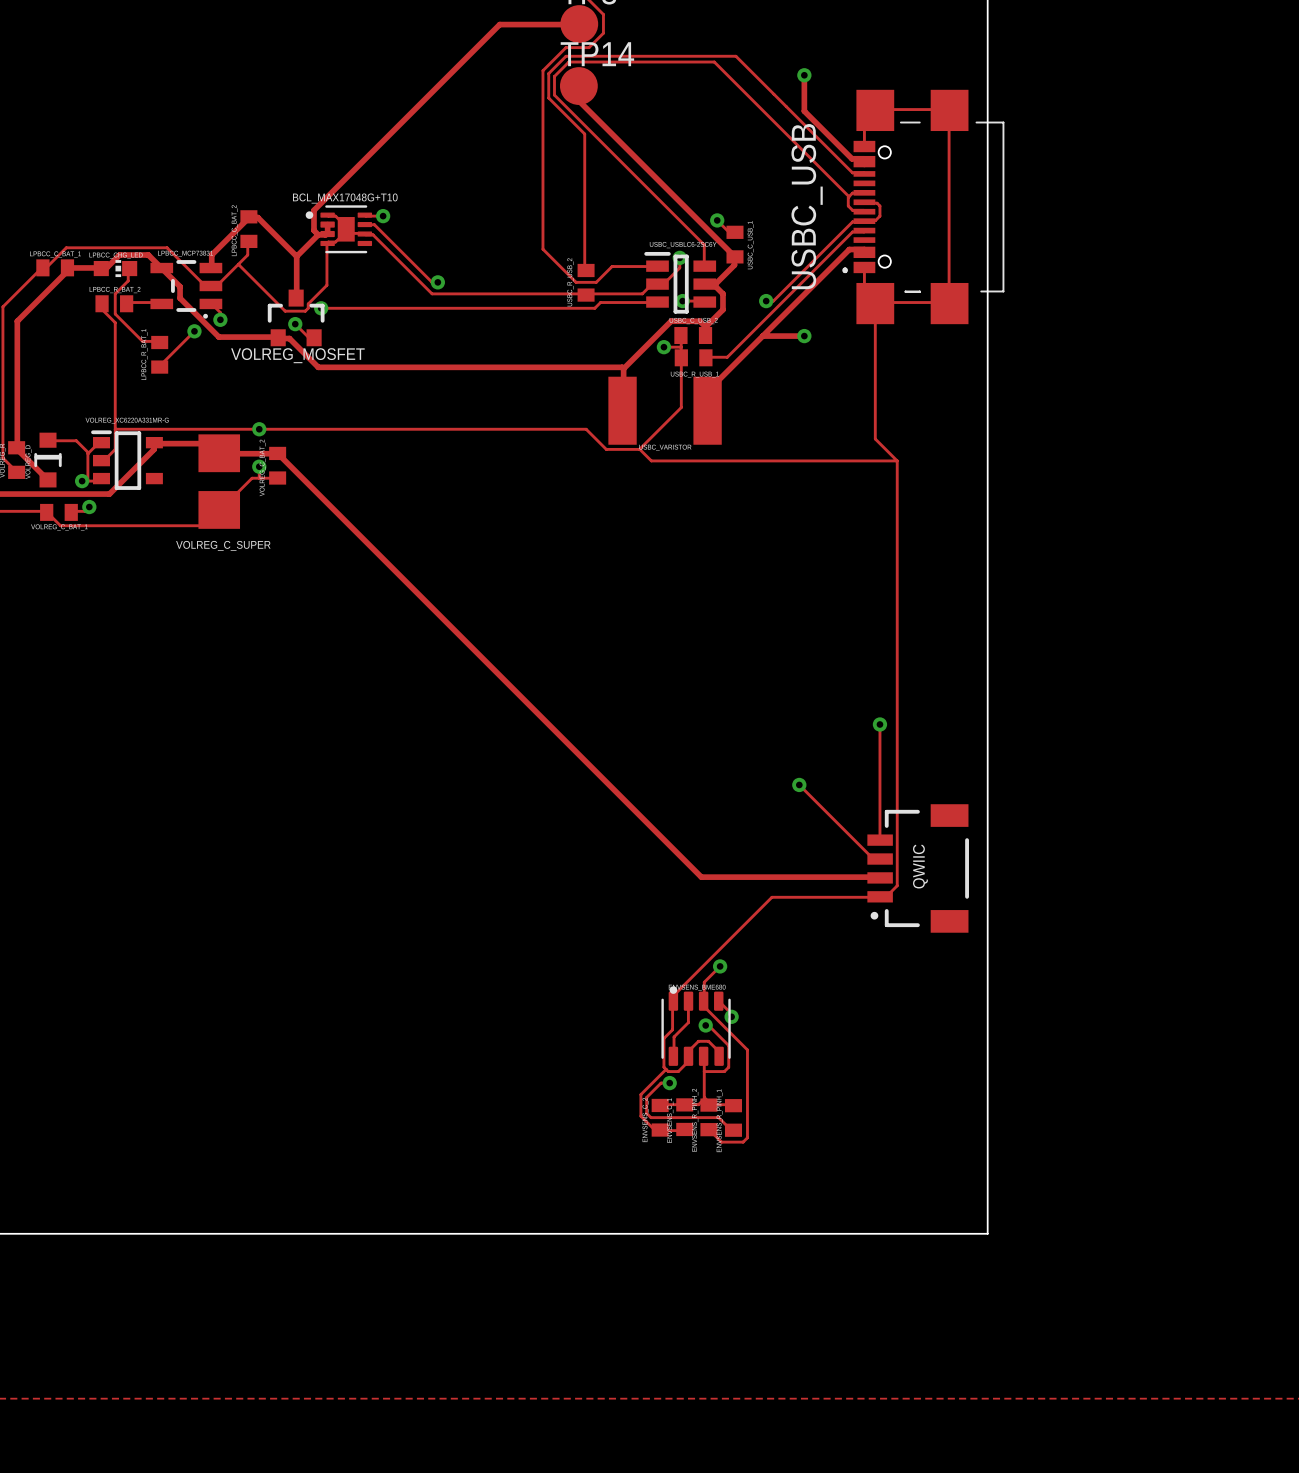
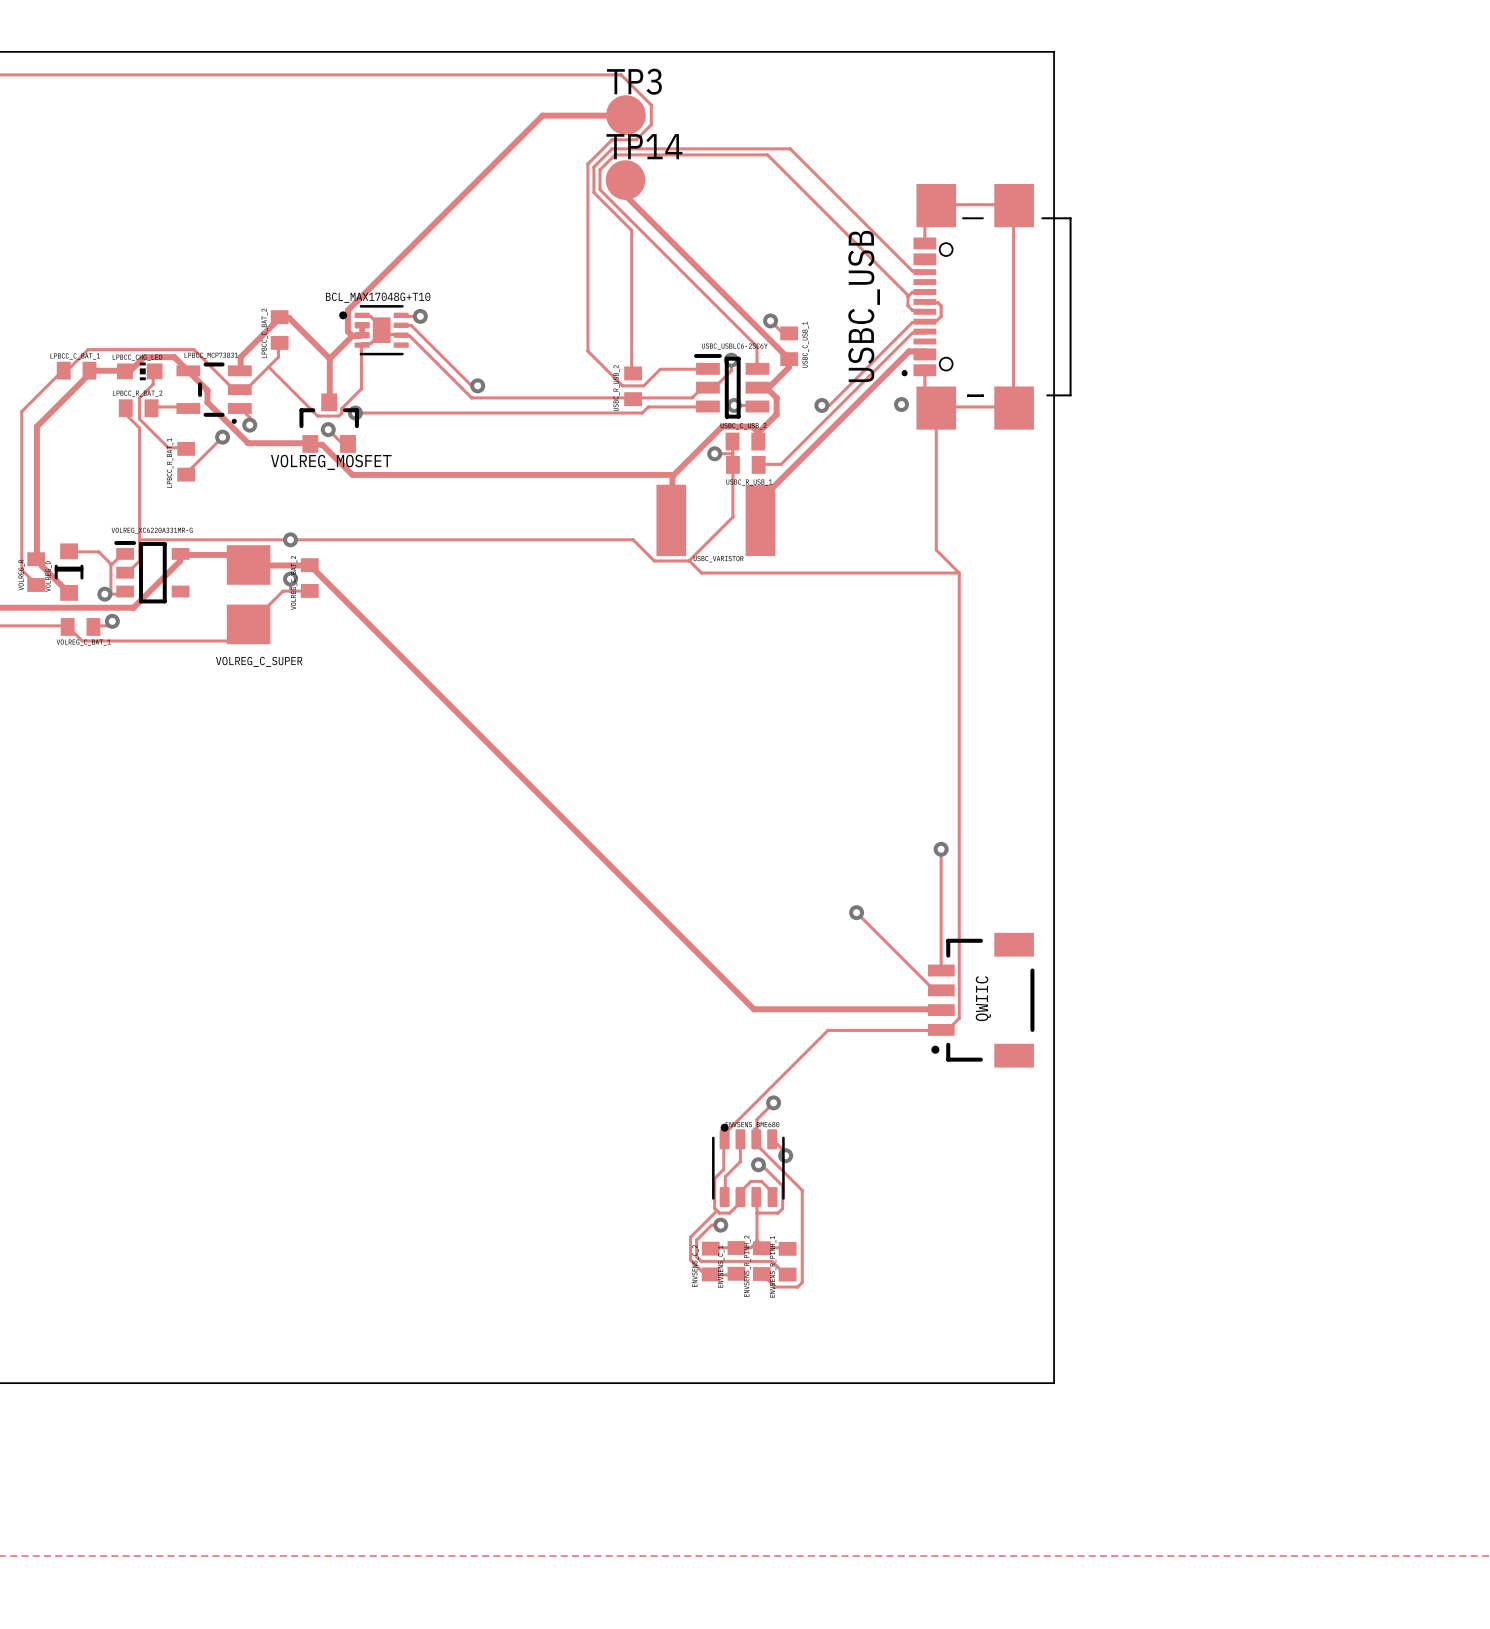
track: (804, 75) (804, 111) (851, 158) (864, 158) (864, 164) -> none
via: (804, 75) -> none
track: (762, 336) (804, 336) -> none
via position: (804, 336) -> (901, 404)

